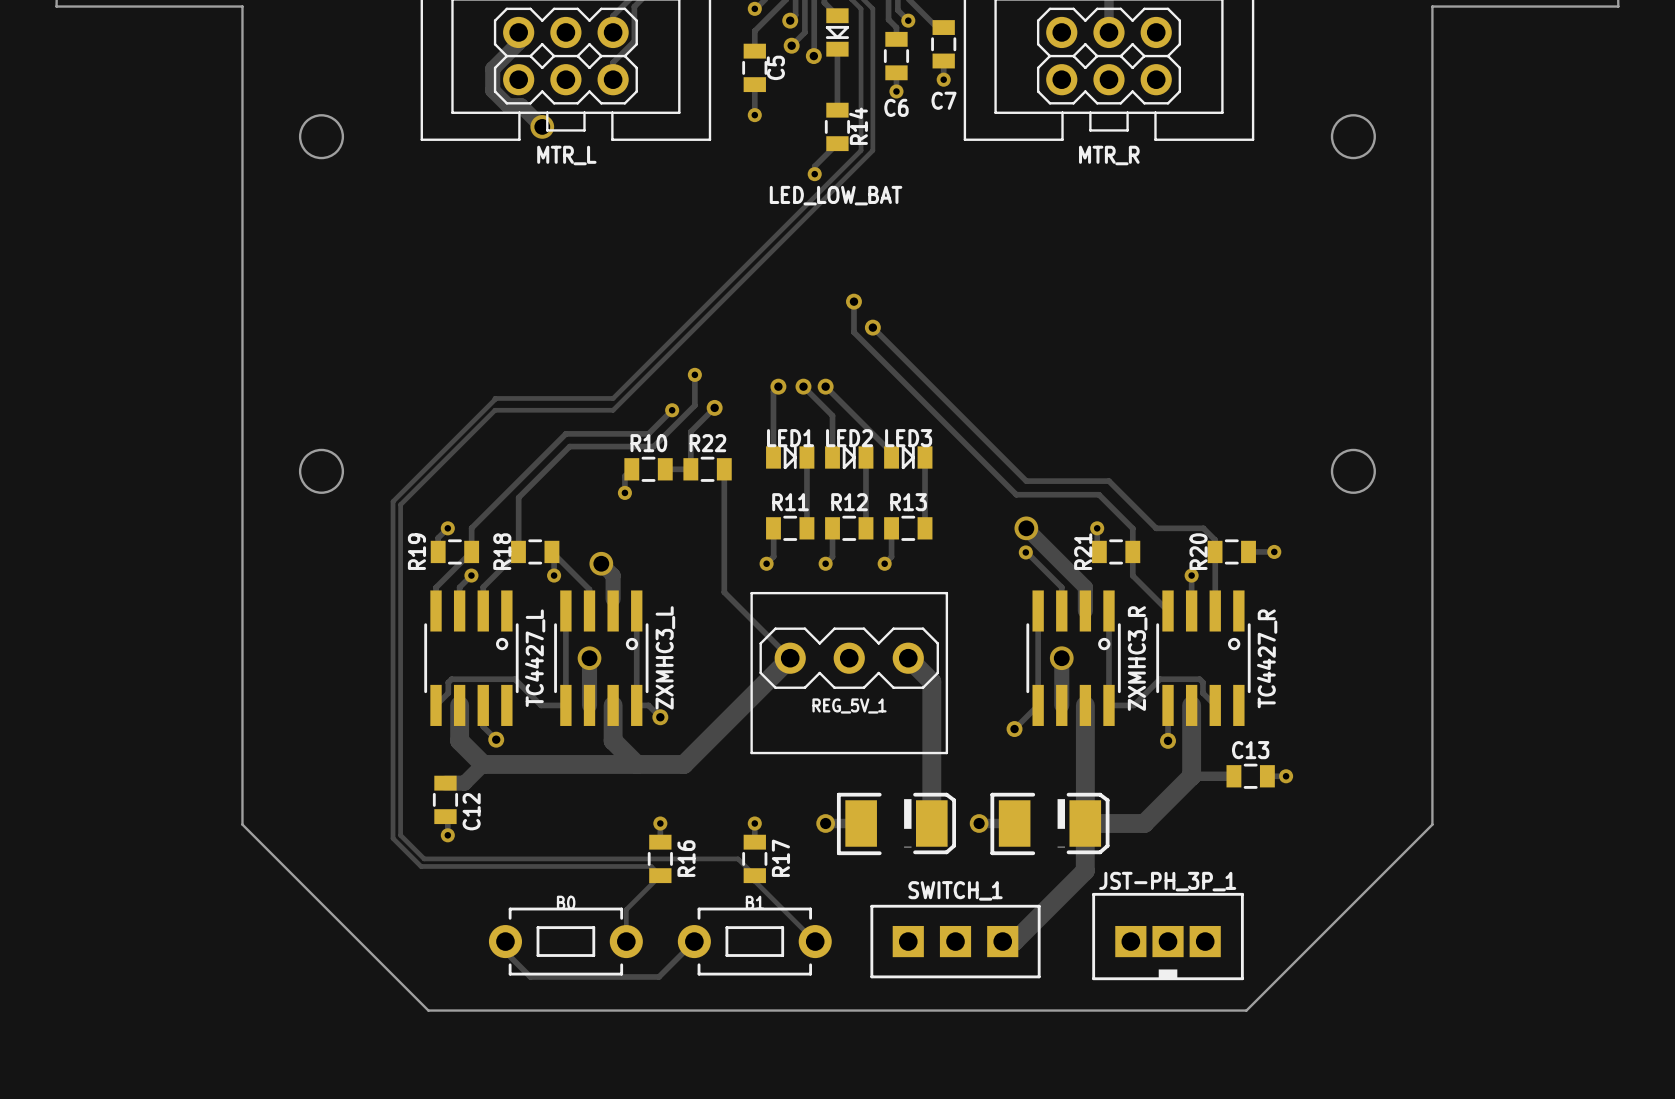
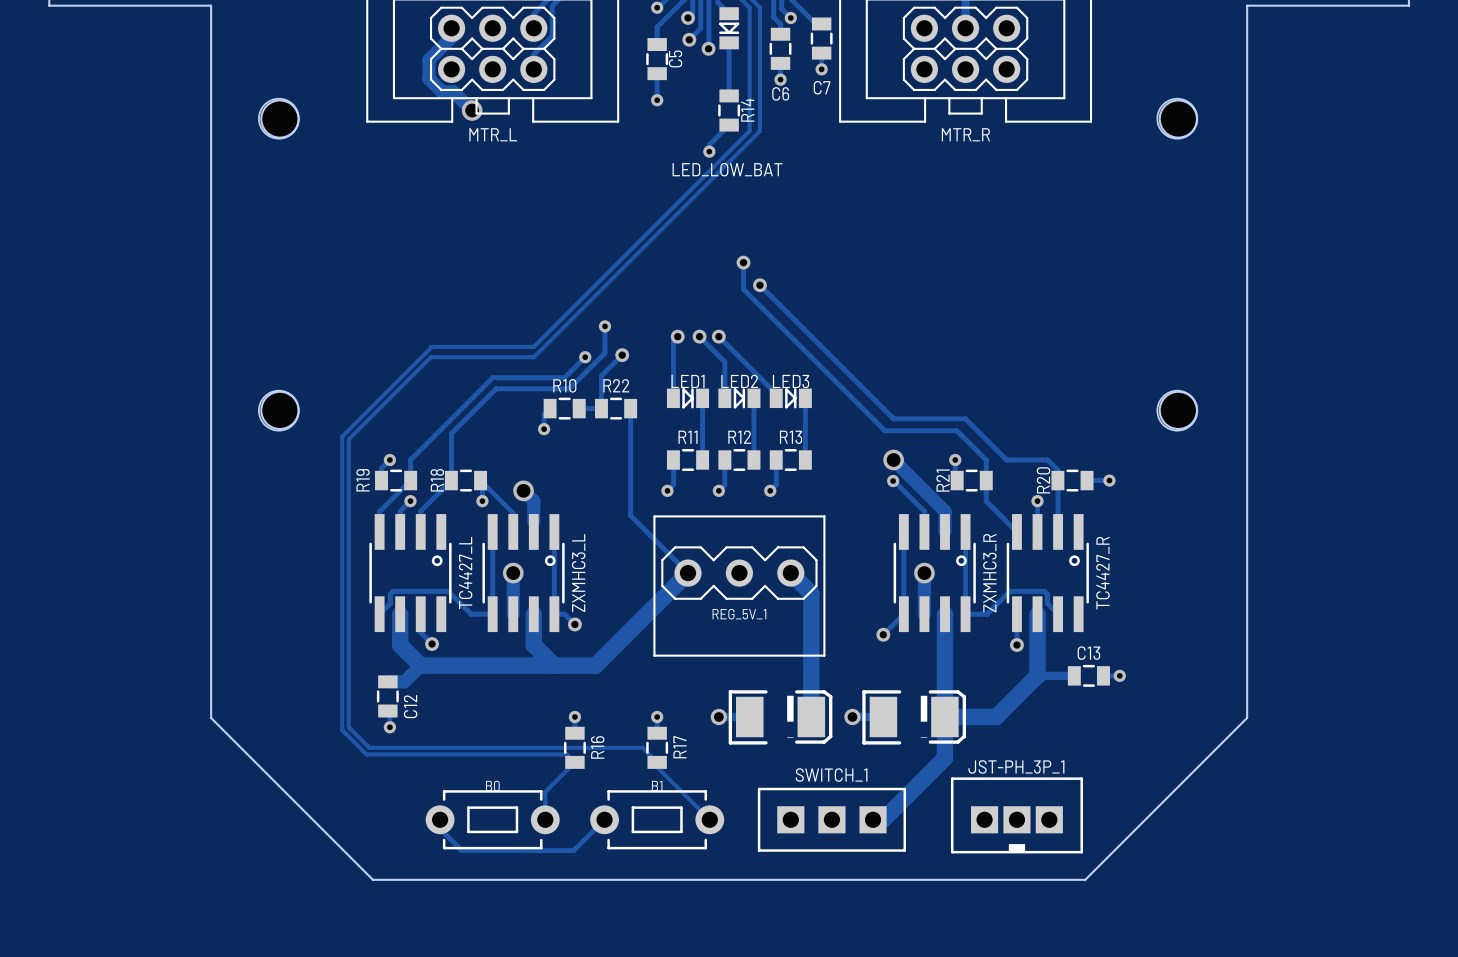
hole: none -> (278, 118)
hole: none -> (1177, 118)
hole: none -> (278, 410)
hole: none -> (1177, 410)

